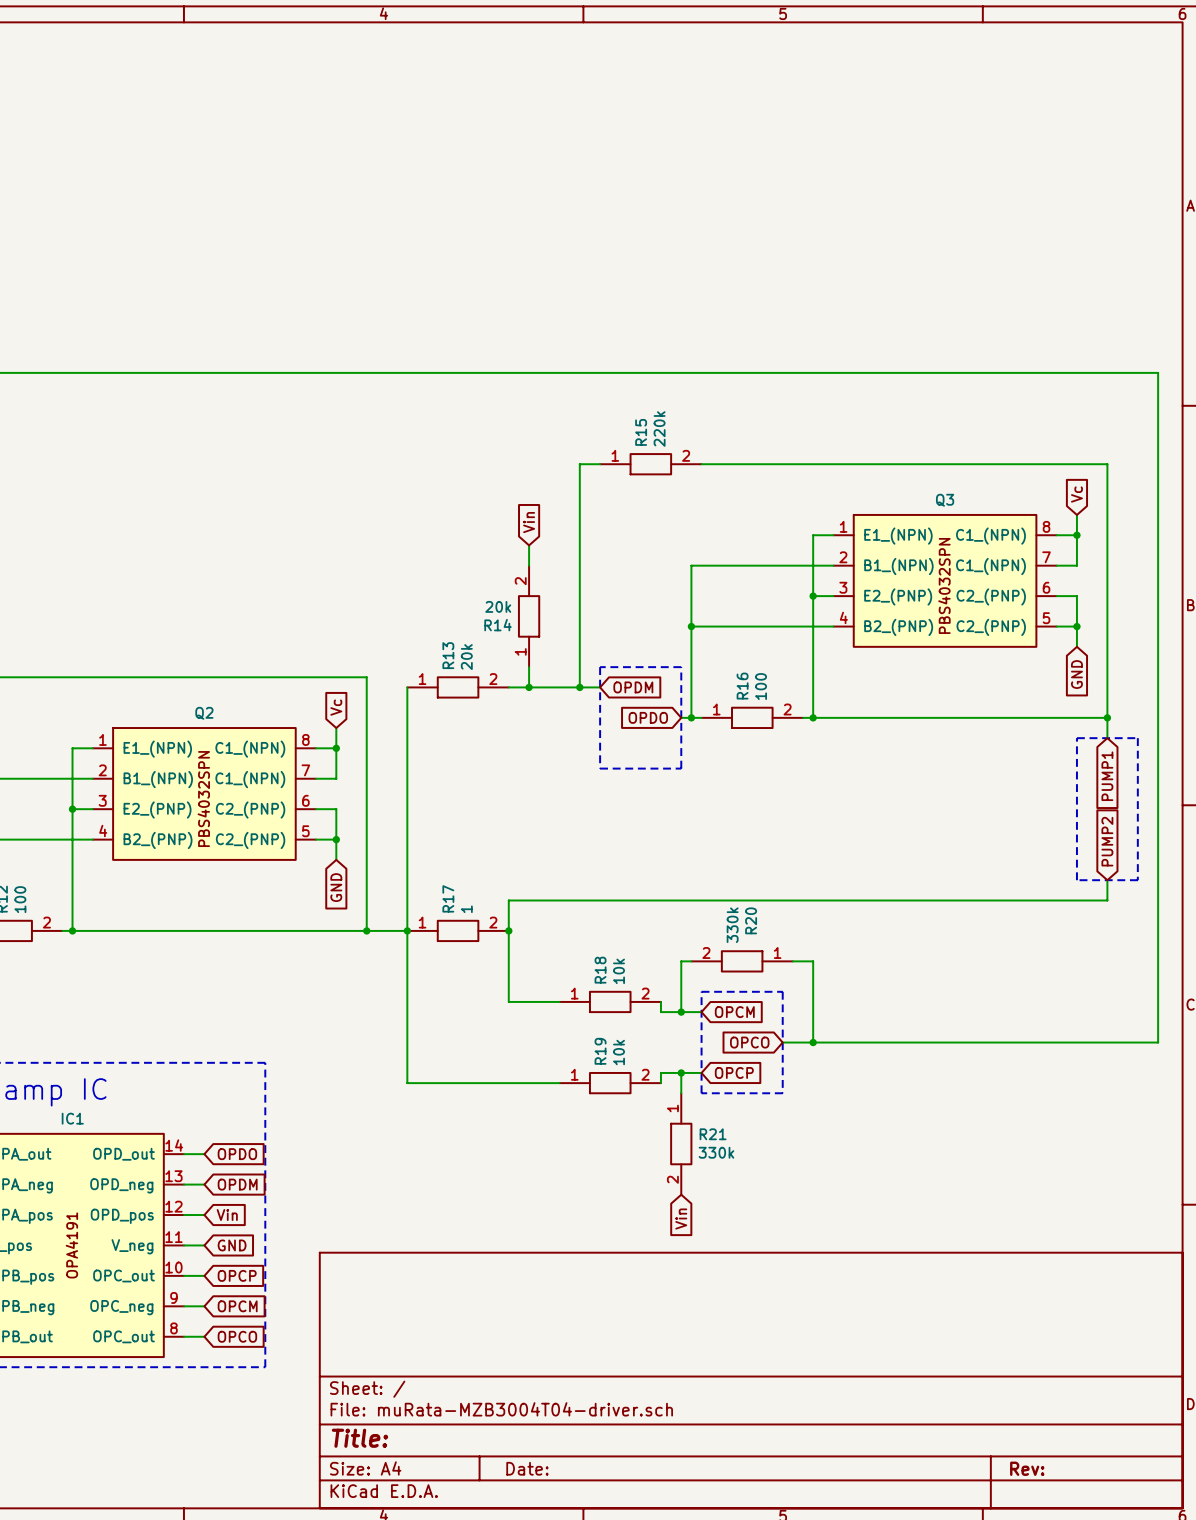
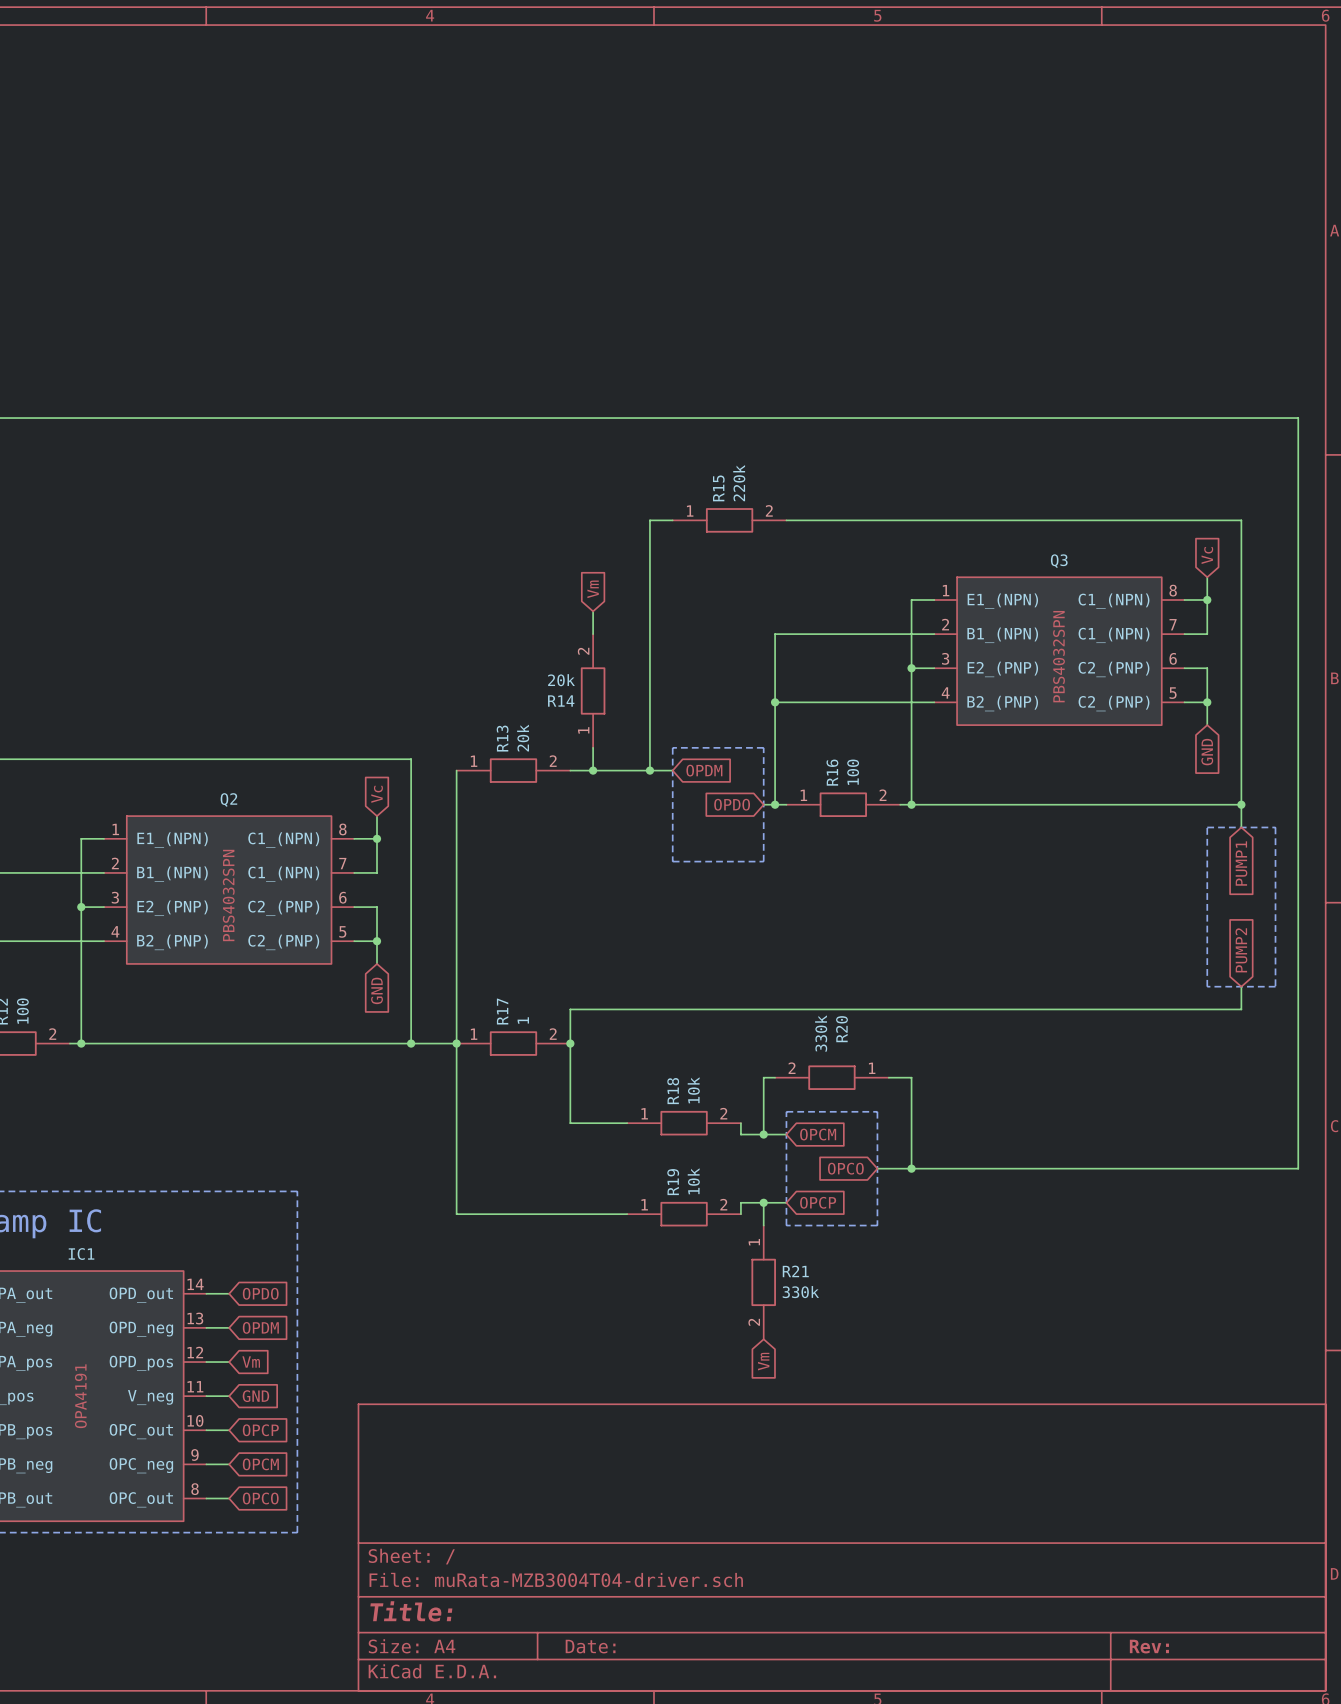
global label: Vin (529, 522) -> Vm (593, 589)
global label: Vin (227, 1215) -> Vm (251, 1362)
global label: Vin (681, 1219) -> Vm (763, 1361)

